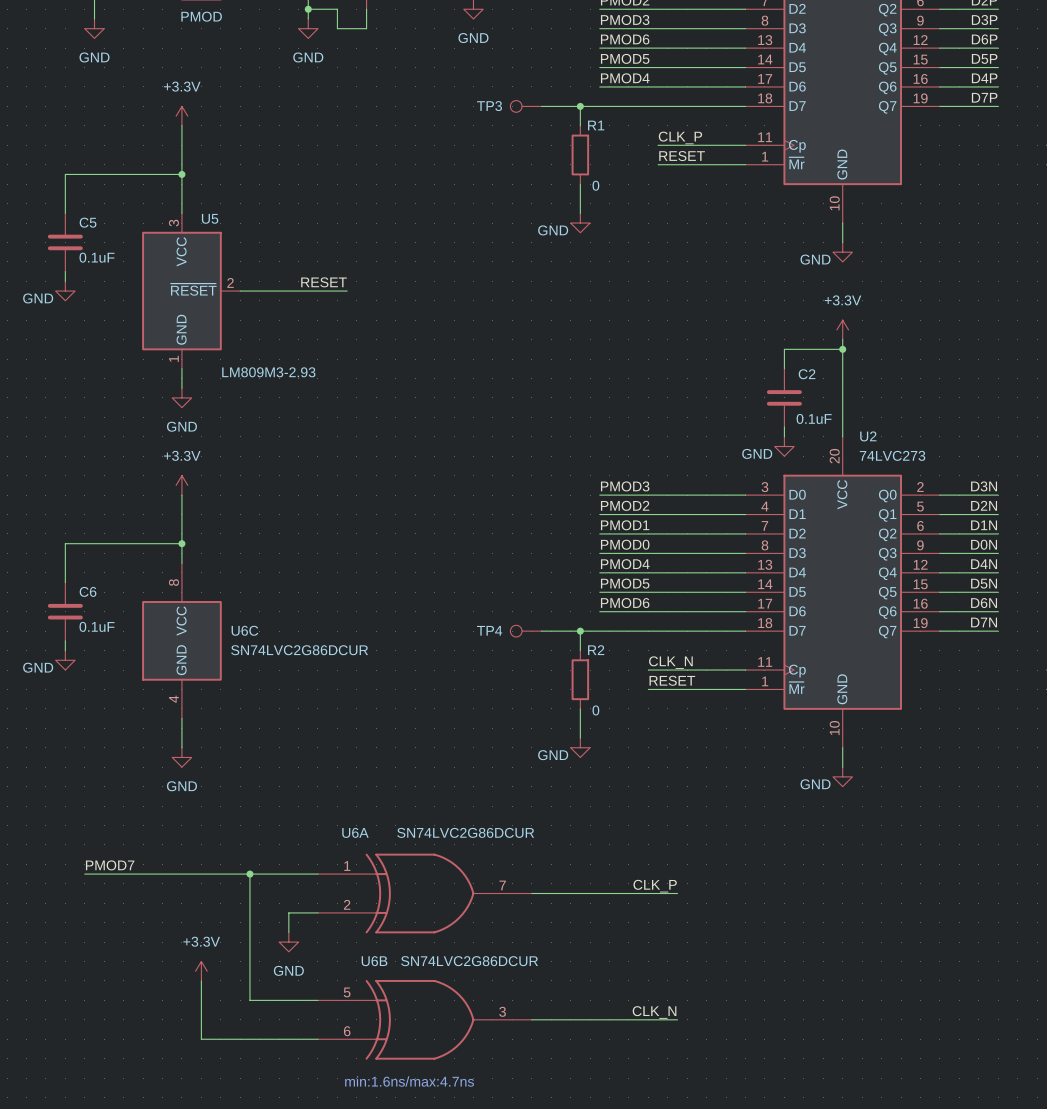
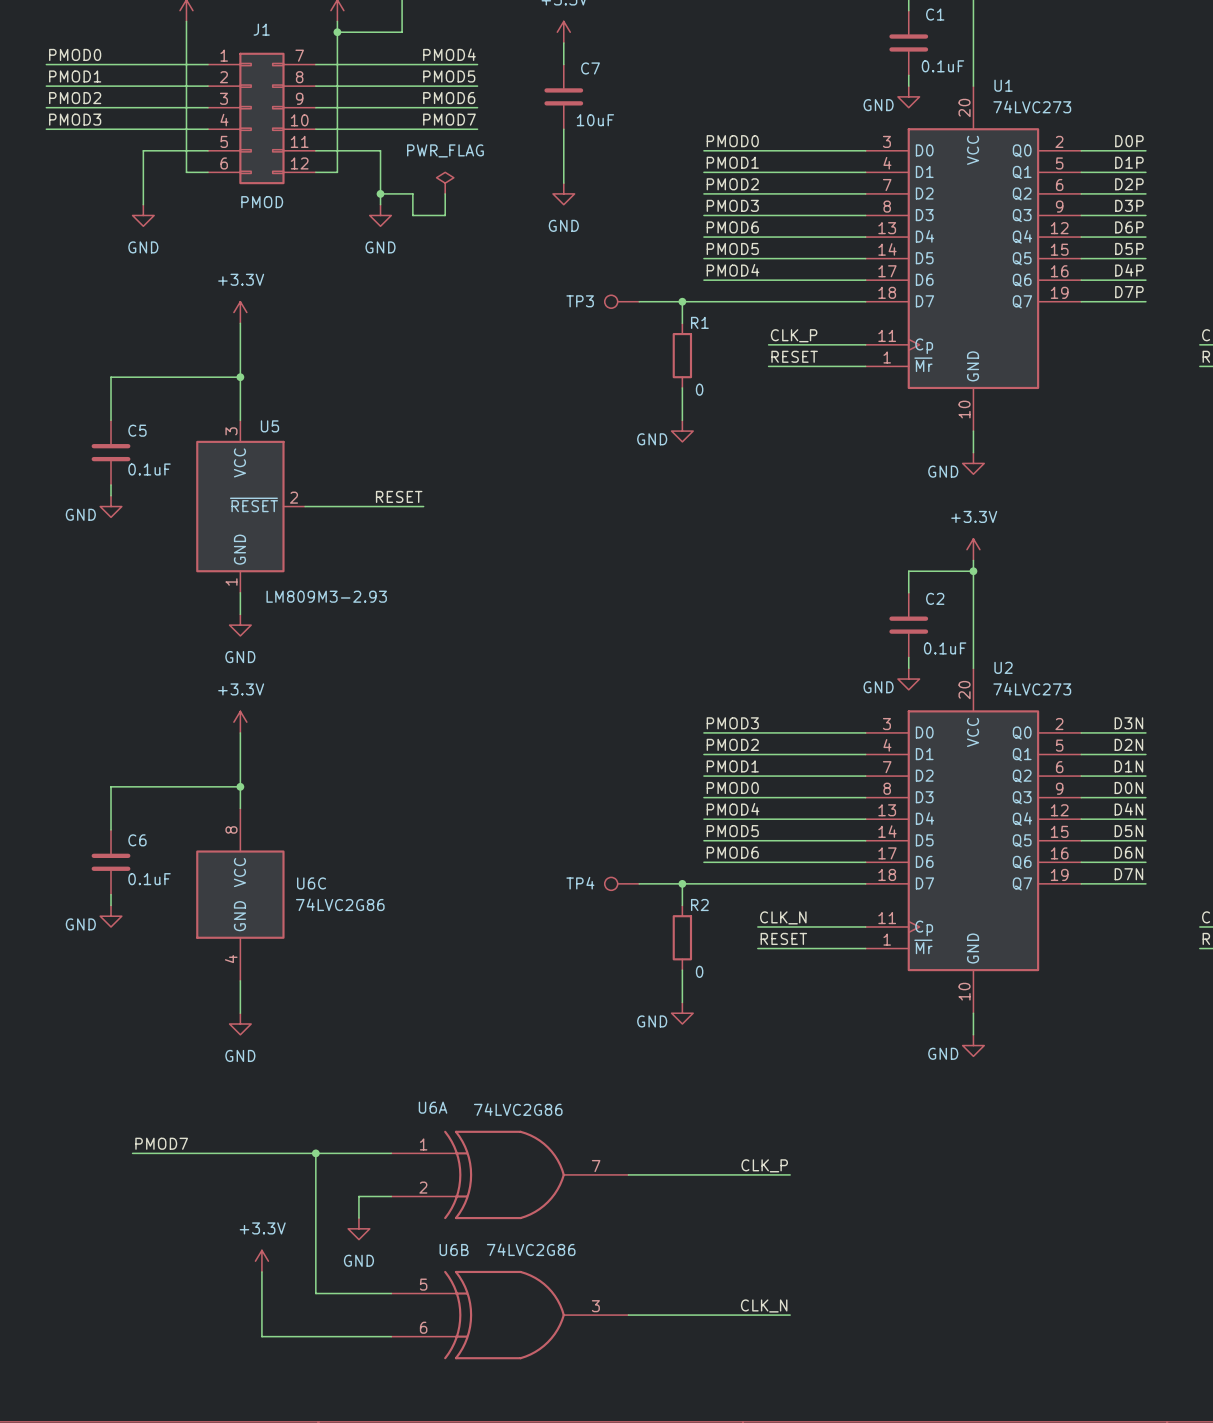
U6C value: SN74LVC2G86DCUR (299, 650) -> 74LVC2G86 (340, 904)
U6A value: SN74LVC2G86DCUR (465, 832) -> 74LVC2G86 (518, 1109)
U6B value: SN74LVC2G86DCUR (469, 961) -> 74LVC2G86 (531, 1249)
text: min:1.6ns/max:4.7ns (409, 1081) -> none

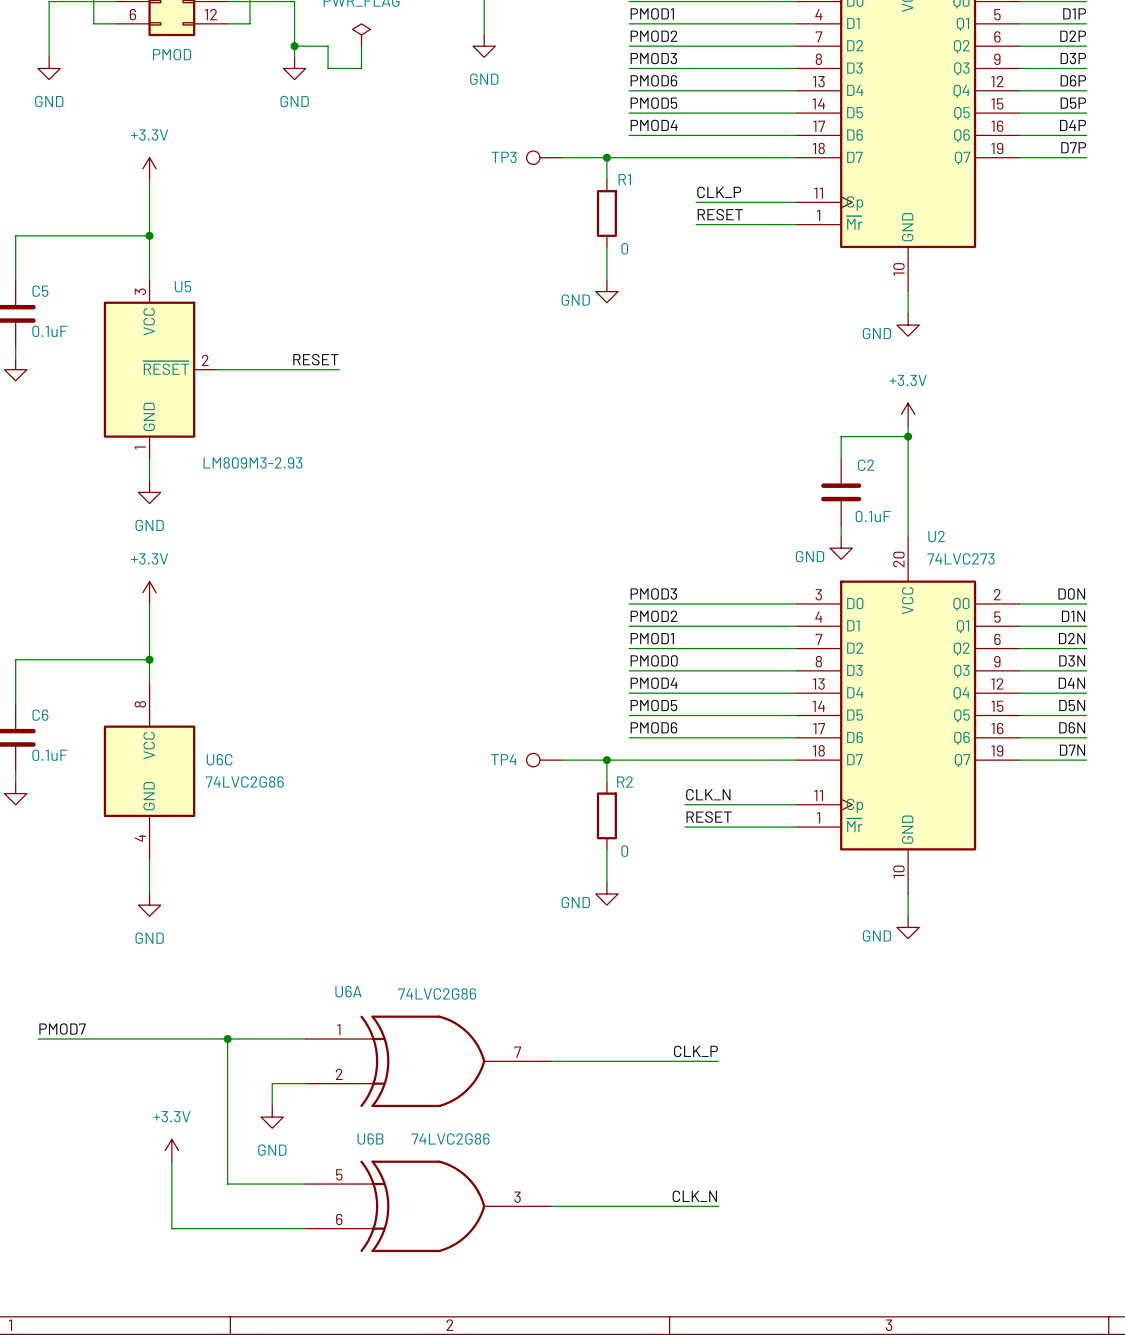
label: D3N (1128, 723) -> D0N (1071, 593)
label: D2N (1128, 744) -> D1N (1073, 616)
label: D1N (1128, 766) -> D2N (1072, 638)
label: D0N (1128, 788) -> D3N (1072, 660)

